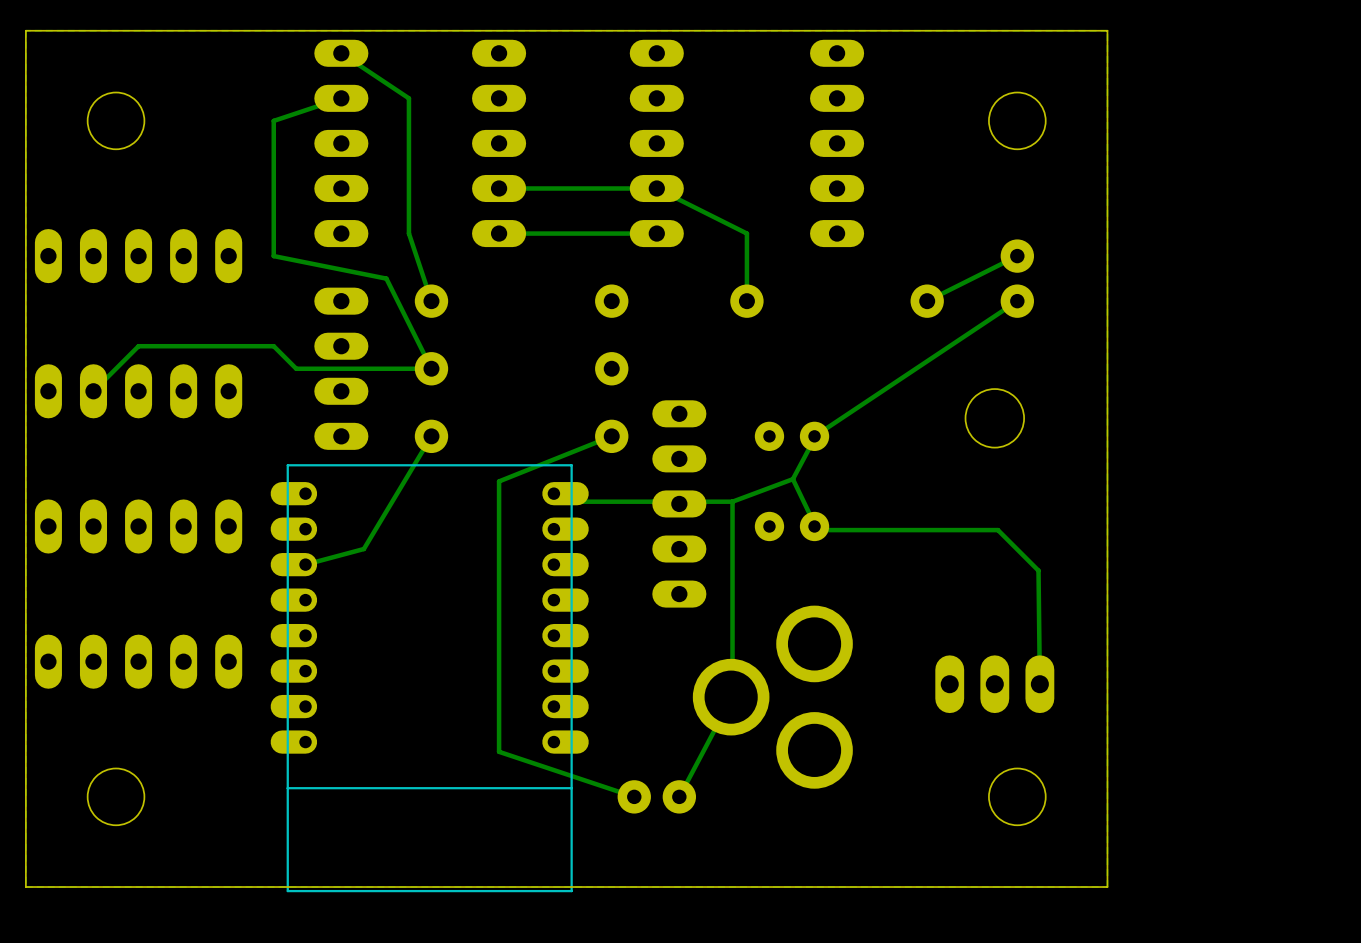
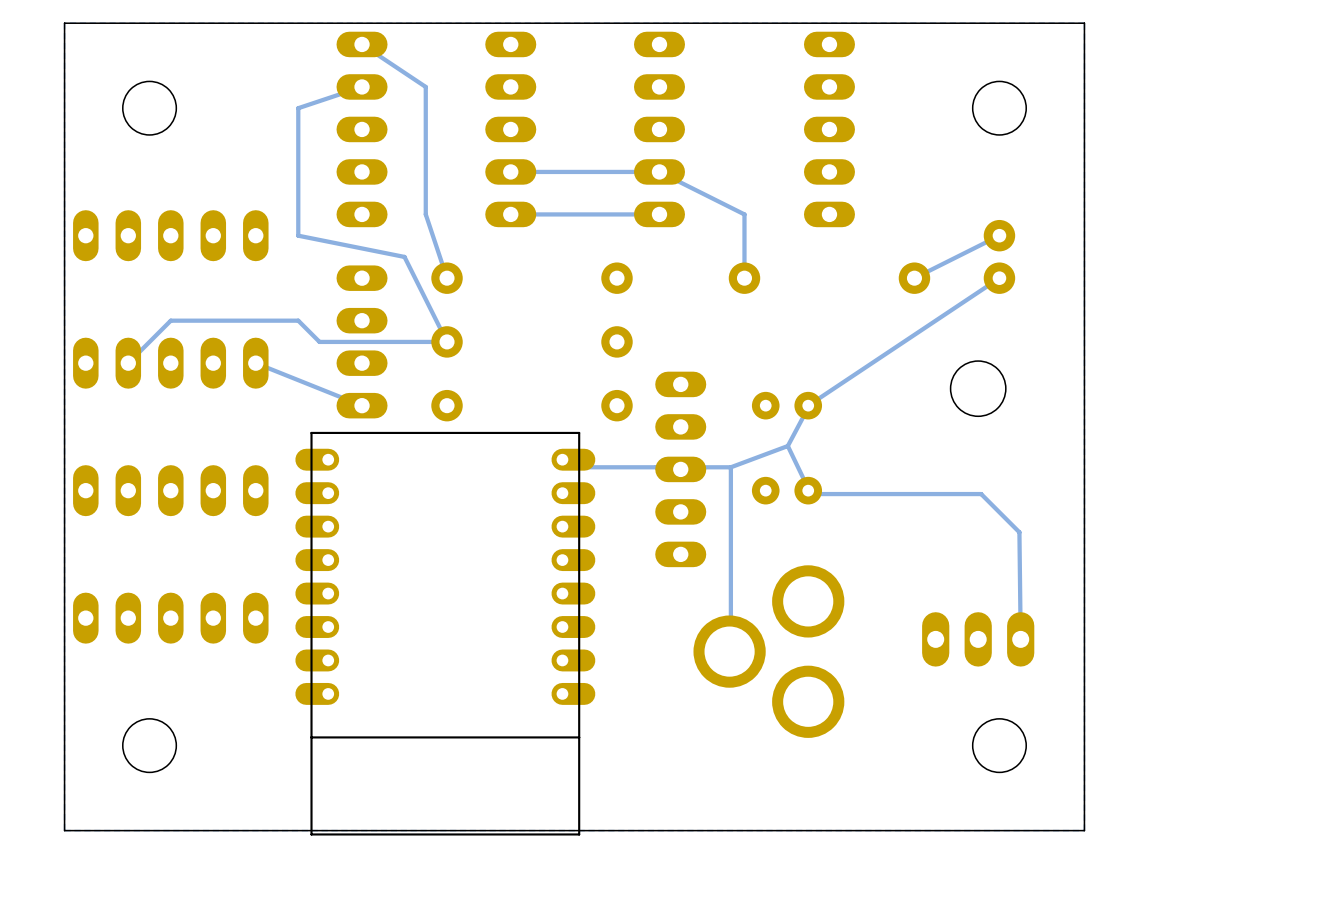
track: none -> (255, 363) (362, 405)
track: (431, 436) (363, 549) (305, 564) -> none
track: (611, 436) (499, 481) (499, 751) (634, 796) -> none
track: (732, 696) (679, 796) -> none
part: (656, 796) -> none

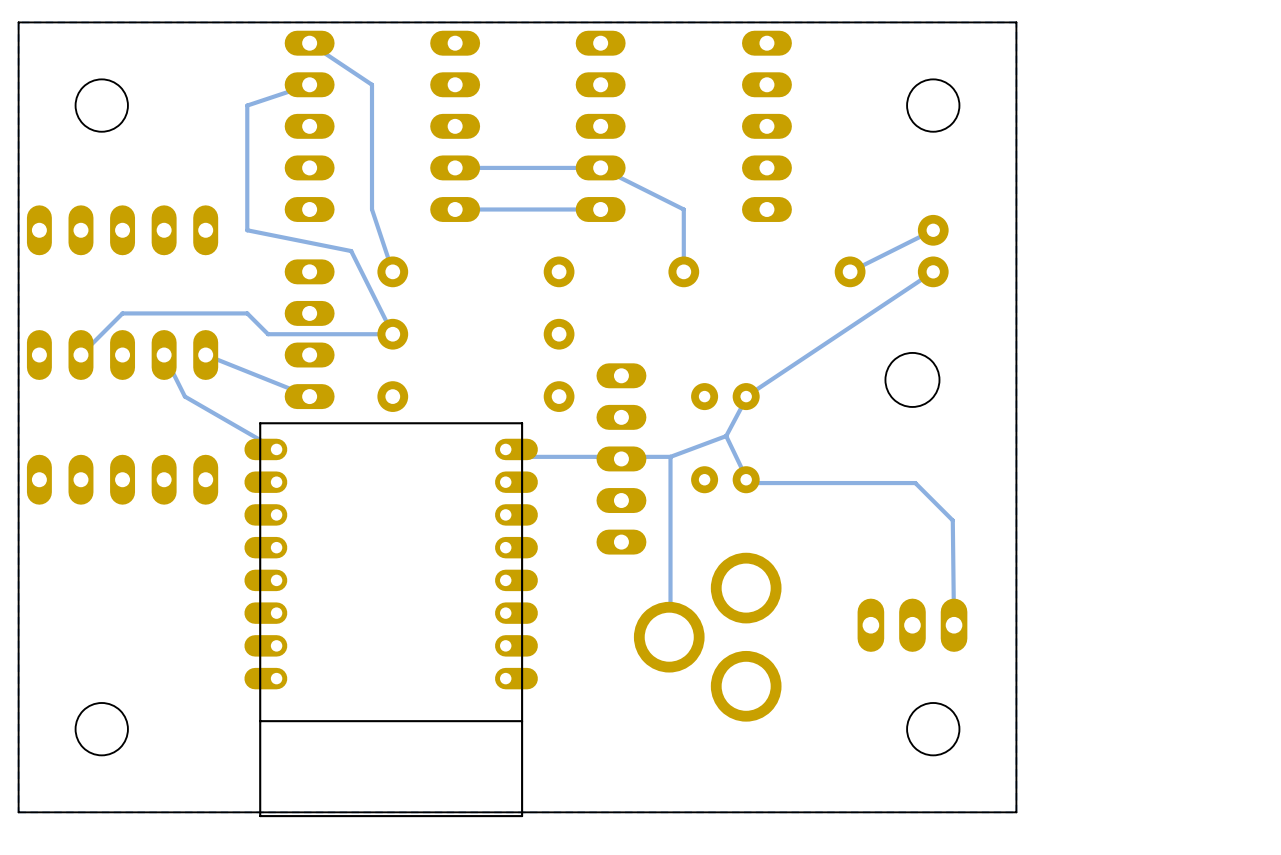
track: none -> (164, 355) (184, 396) (276, 449)
part: (170, 618) -> none

